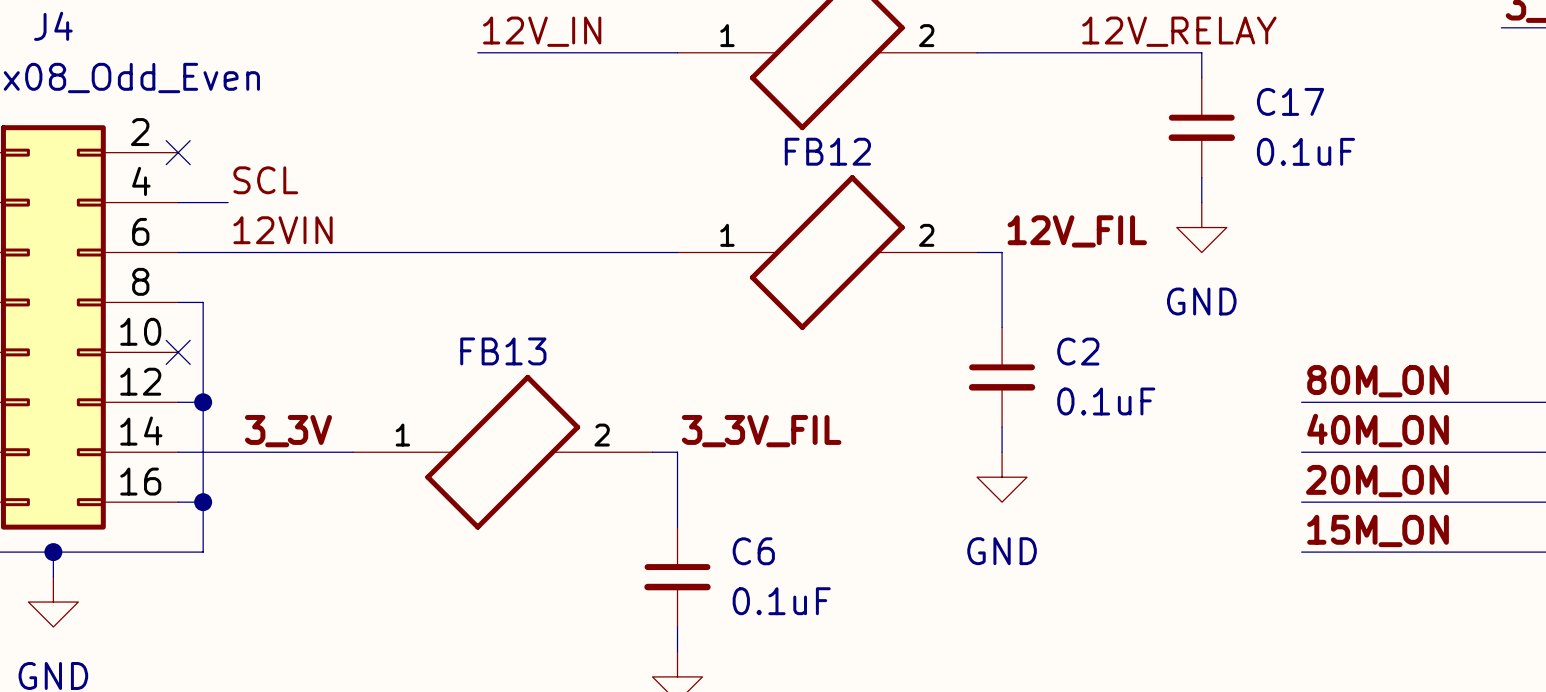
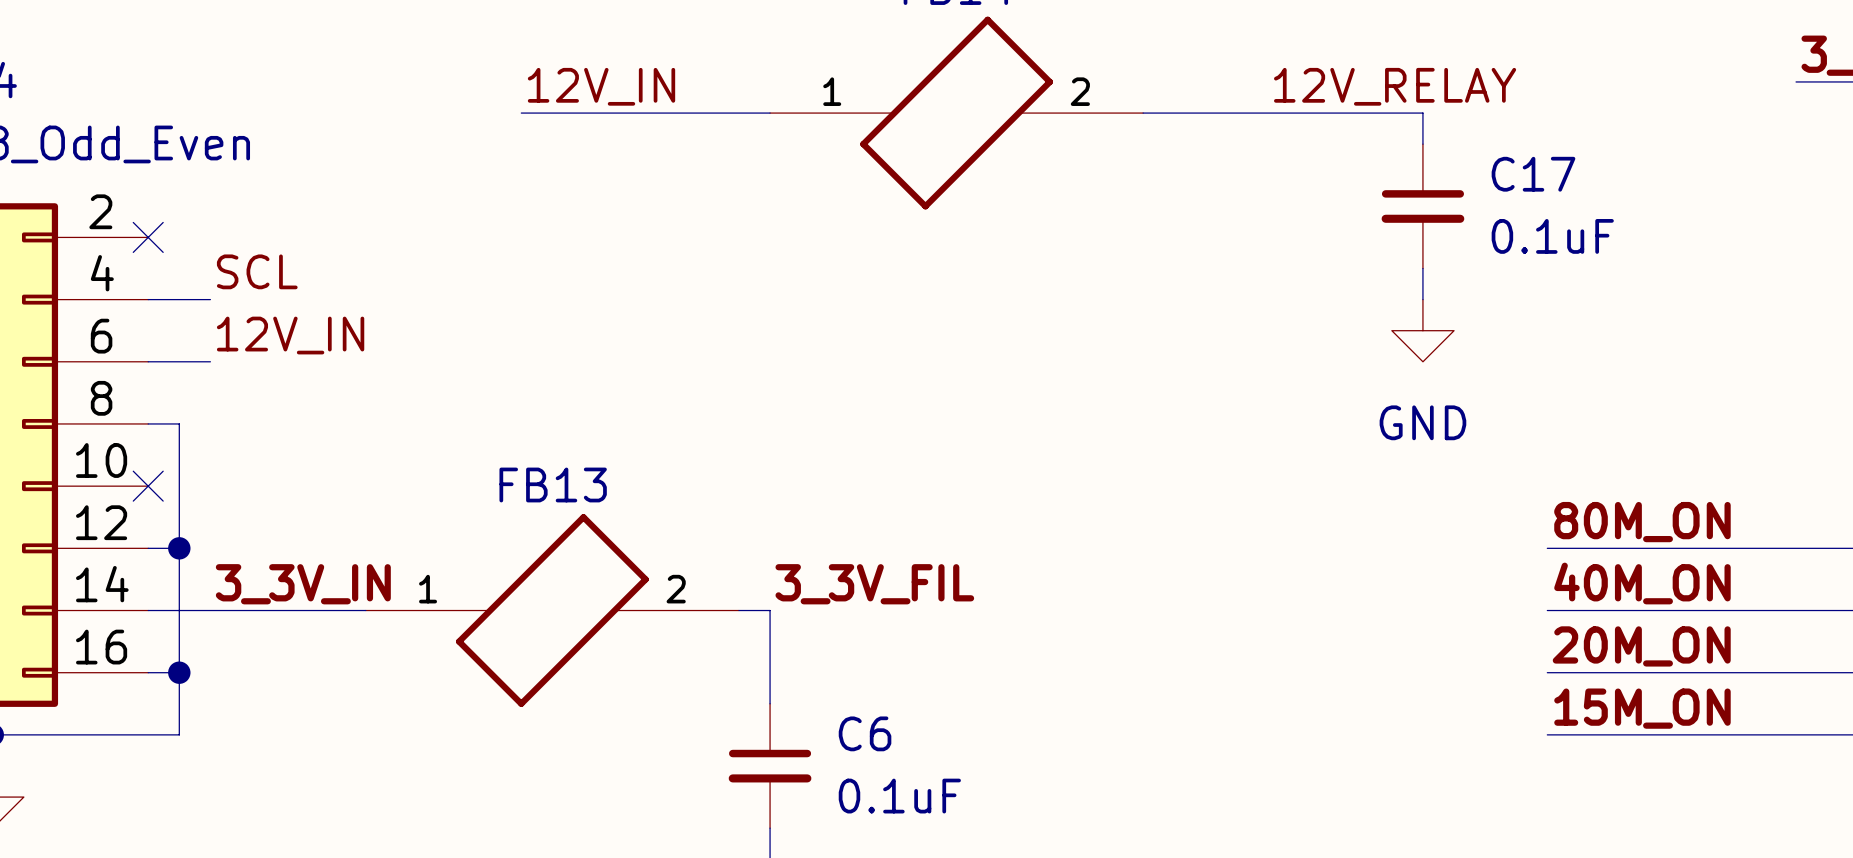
label: 12VIN (283, 230) -> 12V_IN (290, 335)
label: 12V_FIL (1077, 231) -> none
wire: (228, 252) (677, 252) -> none
FB12: (827, 252) -> none
wire: (977, 252) (1002, 252) (1002, 327) -> none
C2: 0.1uF (1002, 377) -> none
wire: (1002, 427) (1002, 452) -> none
label: 3_3V (288, 431) -> 3_3V_IN (303, 584)
power symbol: GND (1002, 477) -> none

